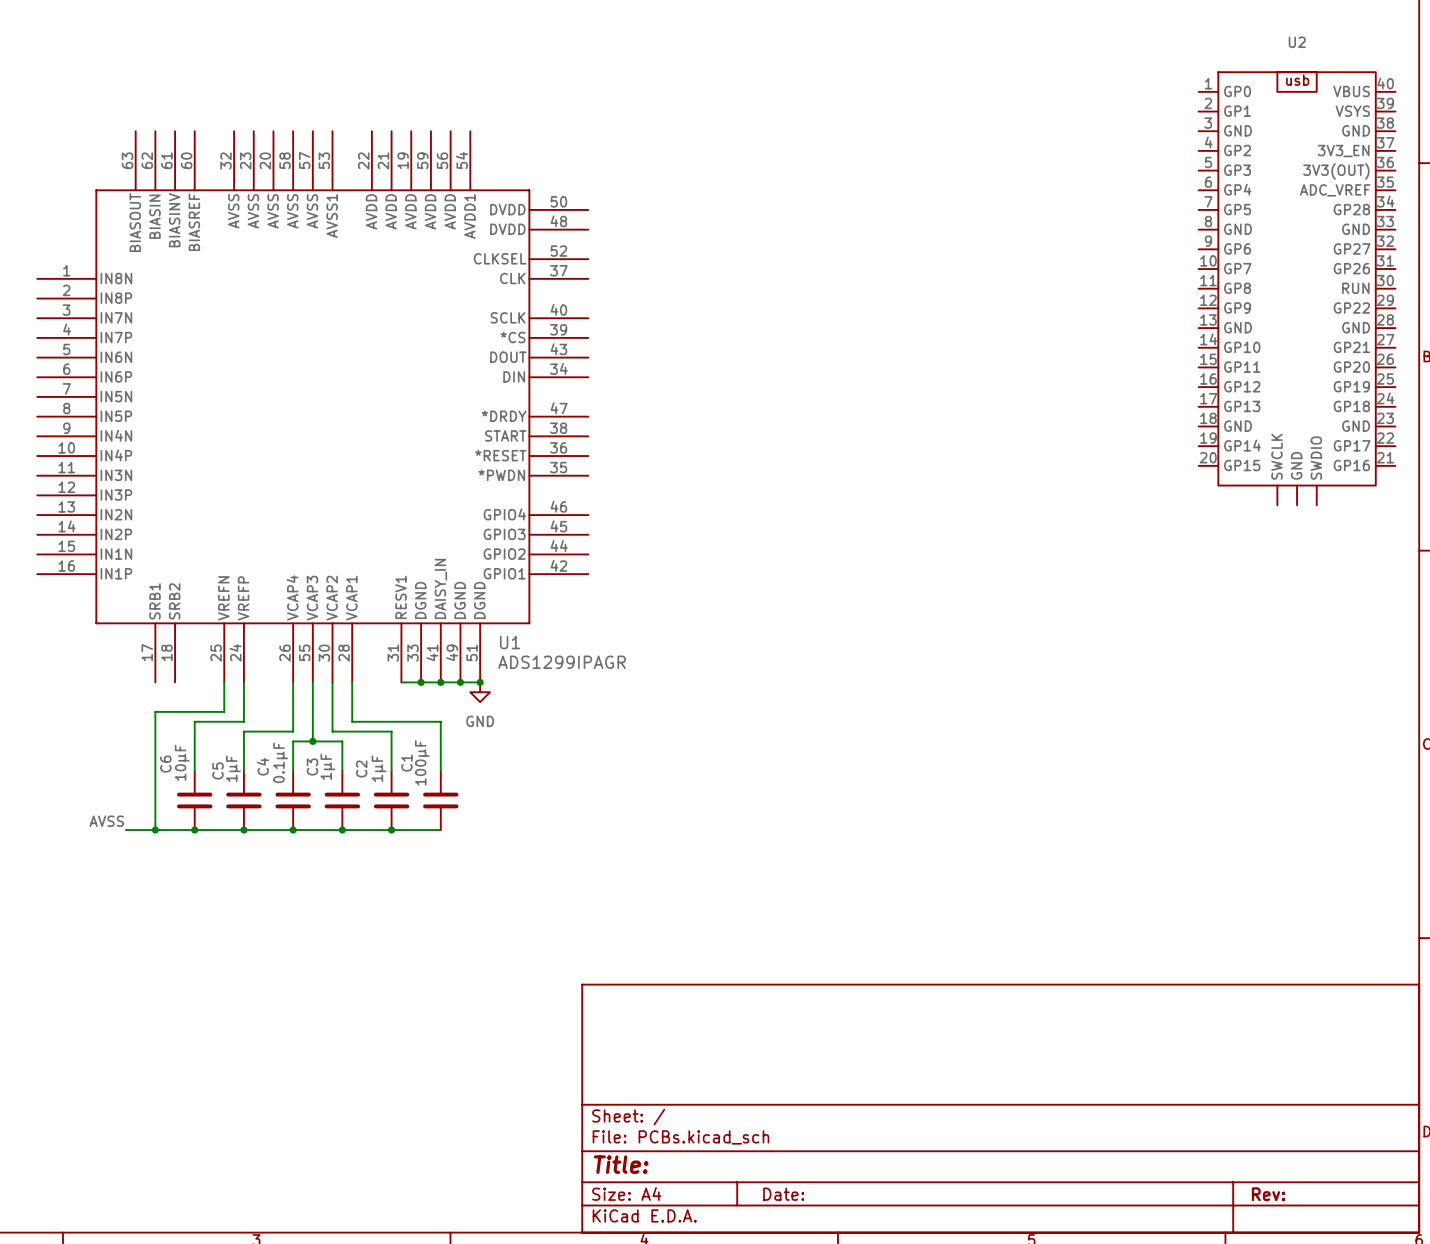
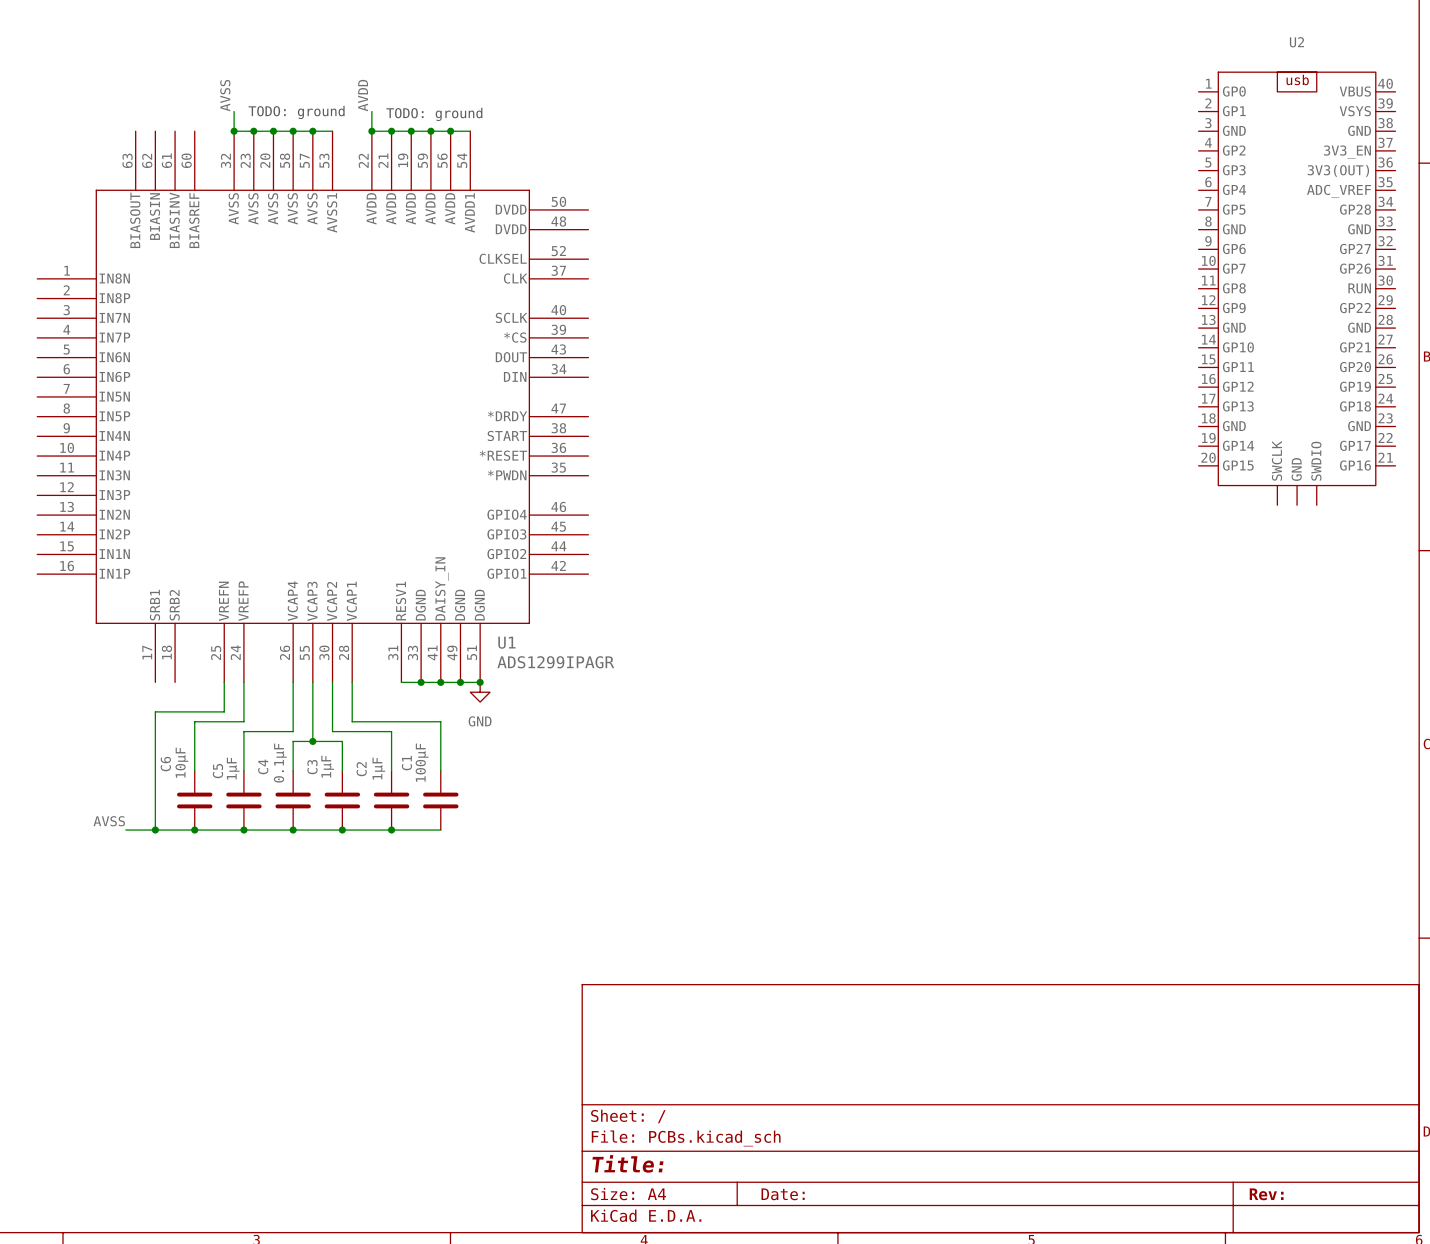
label: none -> AVDD (363, 95)
label: none -> AVSS (225, 95)
wire: none -> (234, 111) (234, 131) (332, 131)
wire: none -> (371, 111) (371, 131) (470, 131)
text: none -> TODO: ground (296, 112)
text: none -> TODO: ground (434, 114)
junction: none -> (234, 131)
junction: none -> (253, 131)
junction: none -> (273, 131)
junction: none -> (293, 131)
junction: none -> (312, 131)
junction: none -> (371, 131)
junction: none -> (391, 131)
junction: none -> (411, 131)
junction: none -> (430, 131)
junction: none -> (450, 131)

